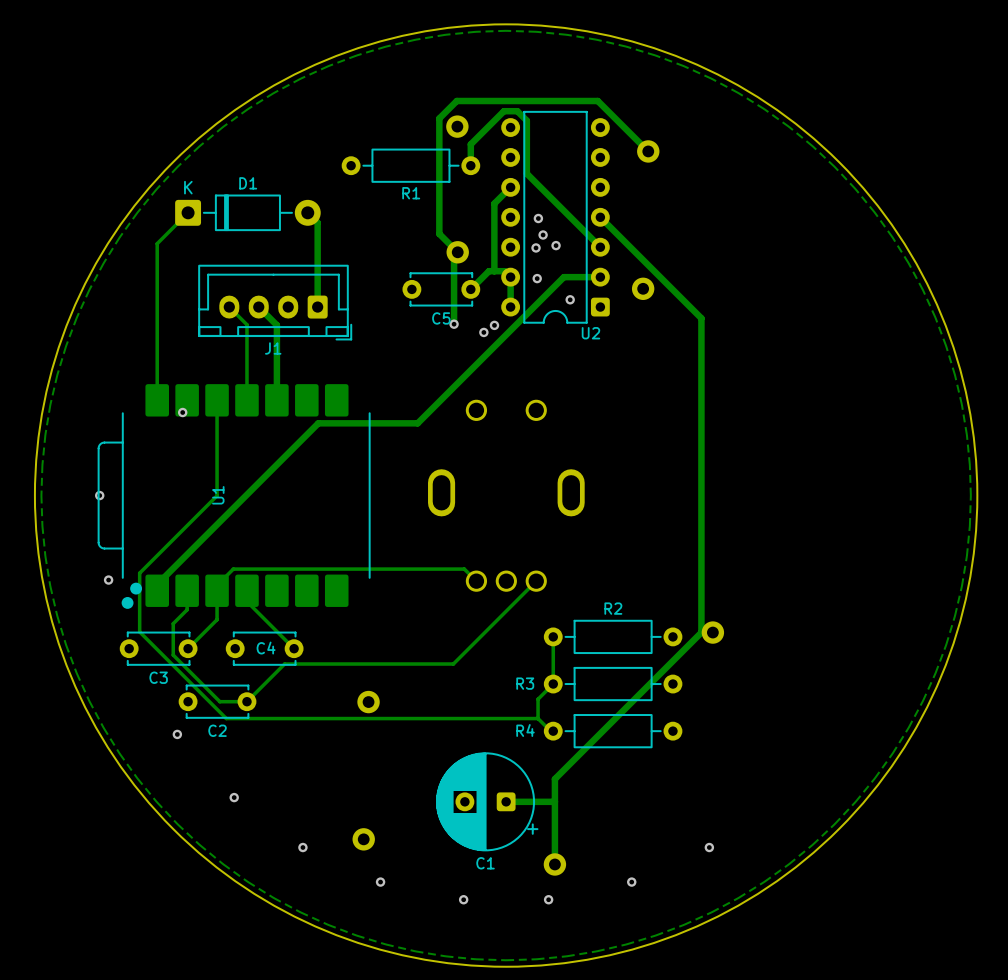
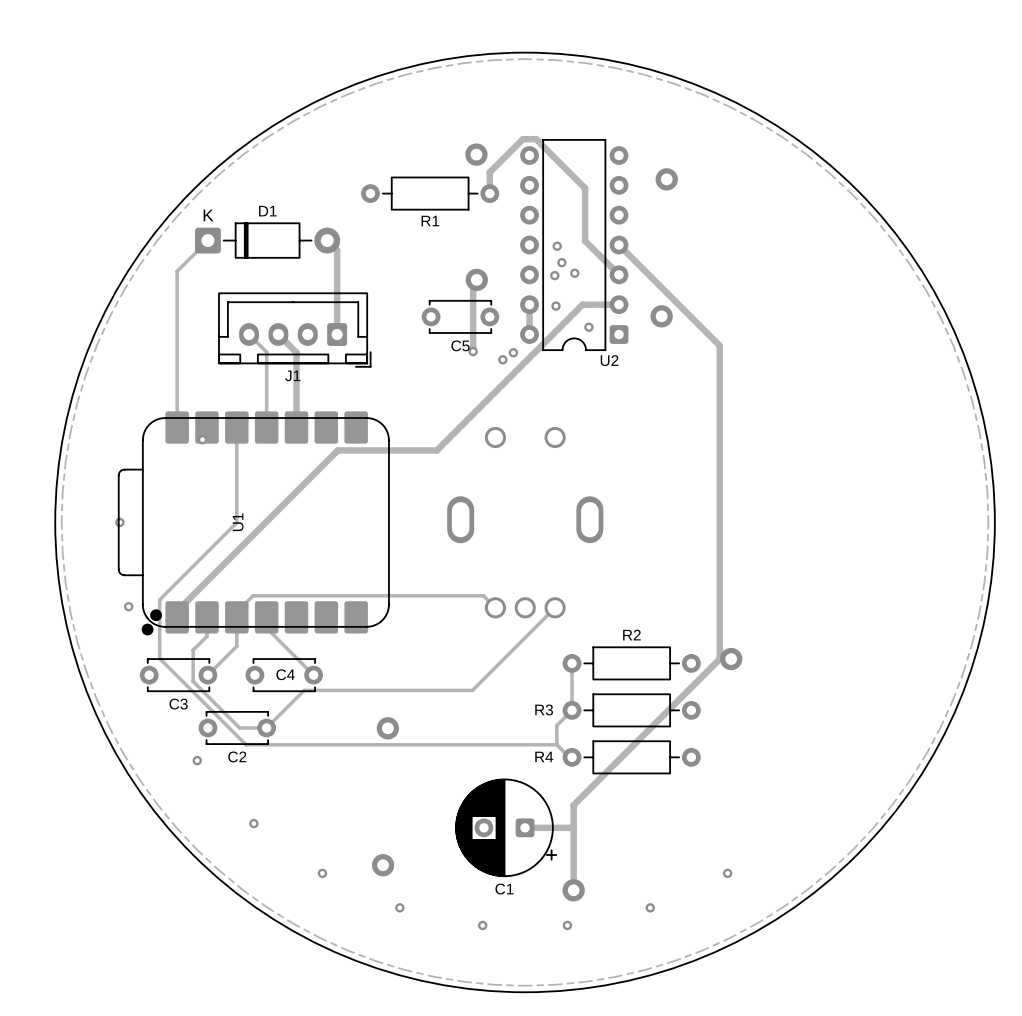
track: (526, 120) (526, 173) (566, 213) -> (545, 148) (585, 188) (585, 240)
track: (648, 151) (597, 101) (456, 101) (439, 118) (439, 233) (457, 252) -> none
track: (510, 187) (494, 203) (494, 271) -> none
track: (510, 277) (504, 271) (489, 271) (470, 289) -> none
U1 footprint: [97, 384, 371, 609] -> [117, 411, 390, 636]

